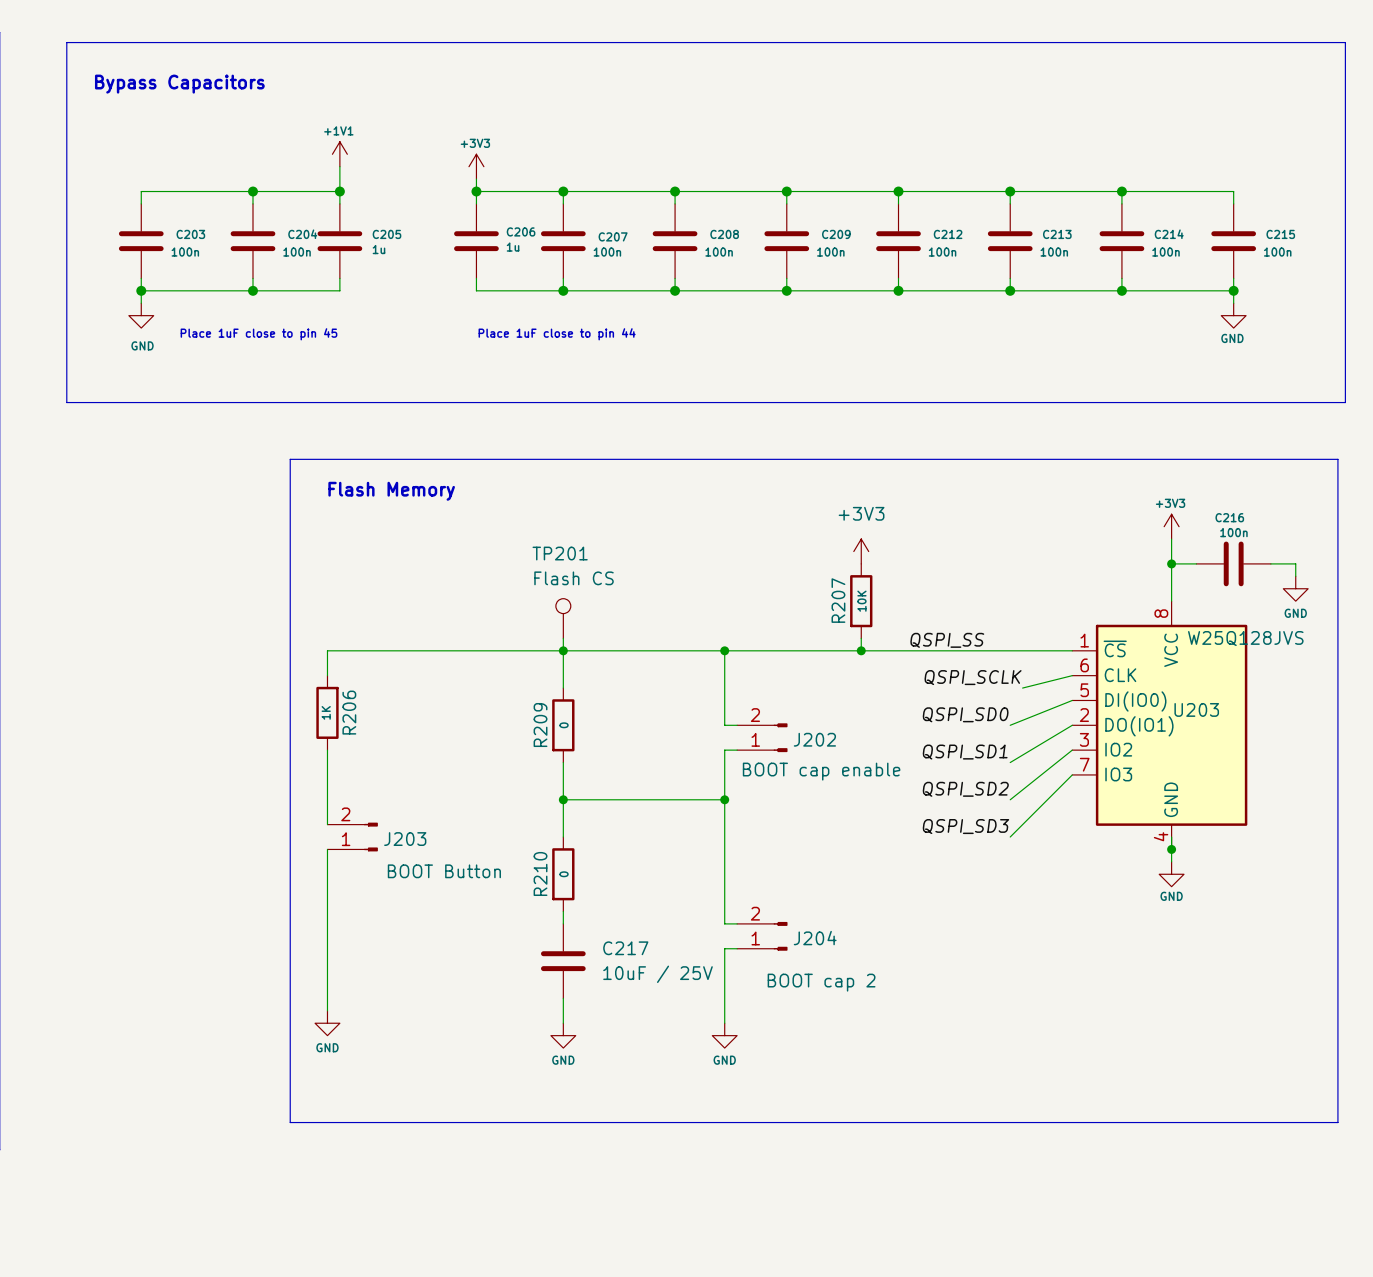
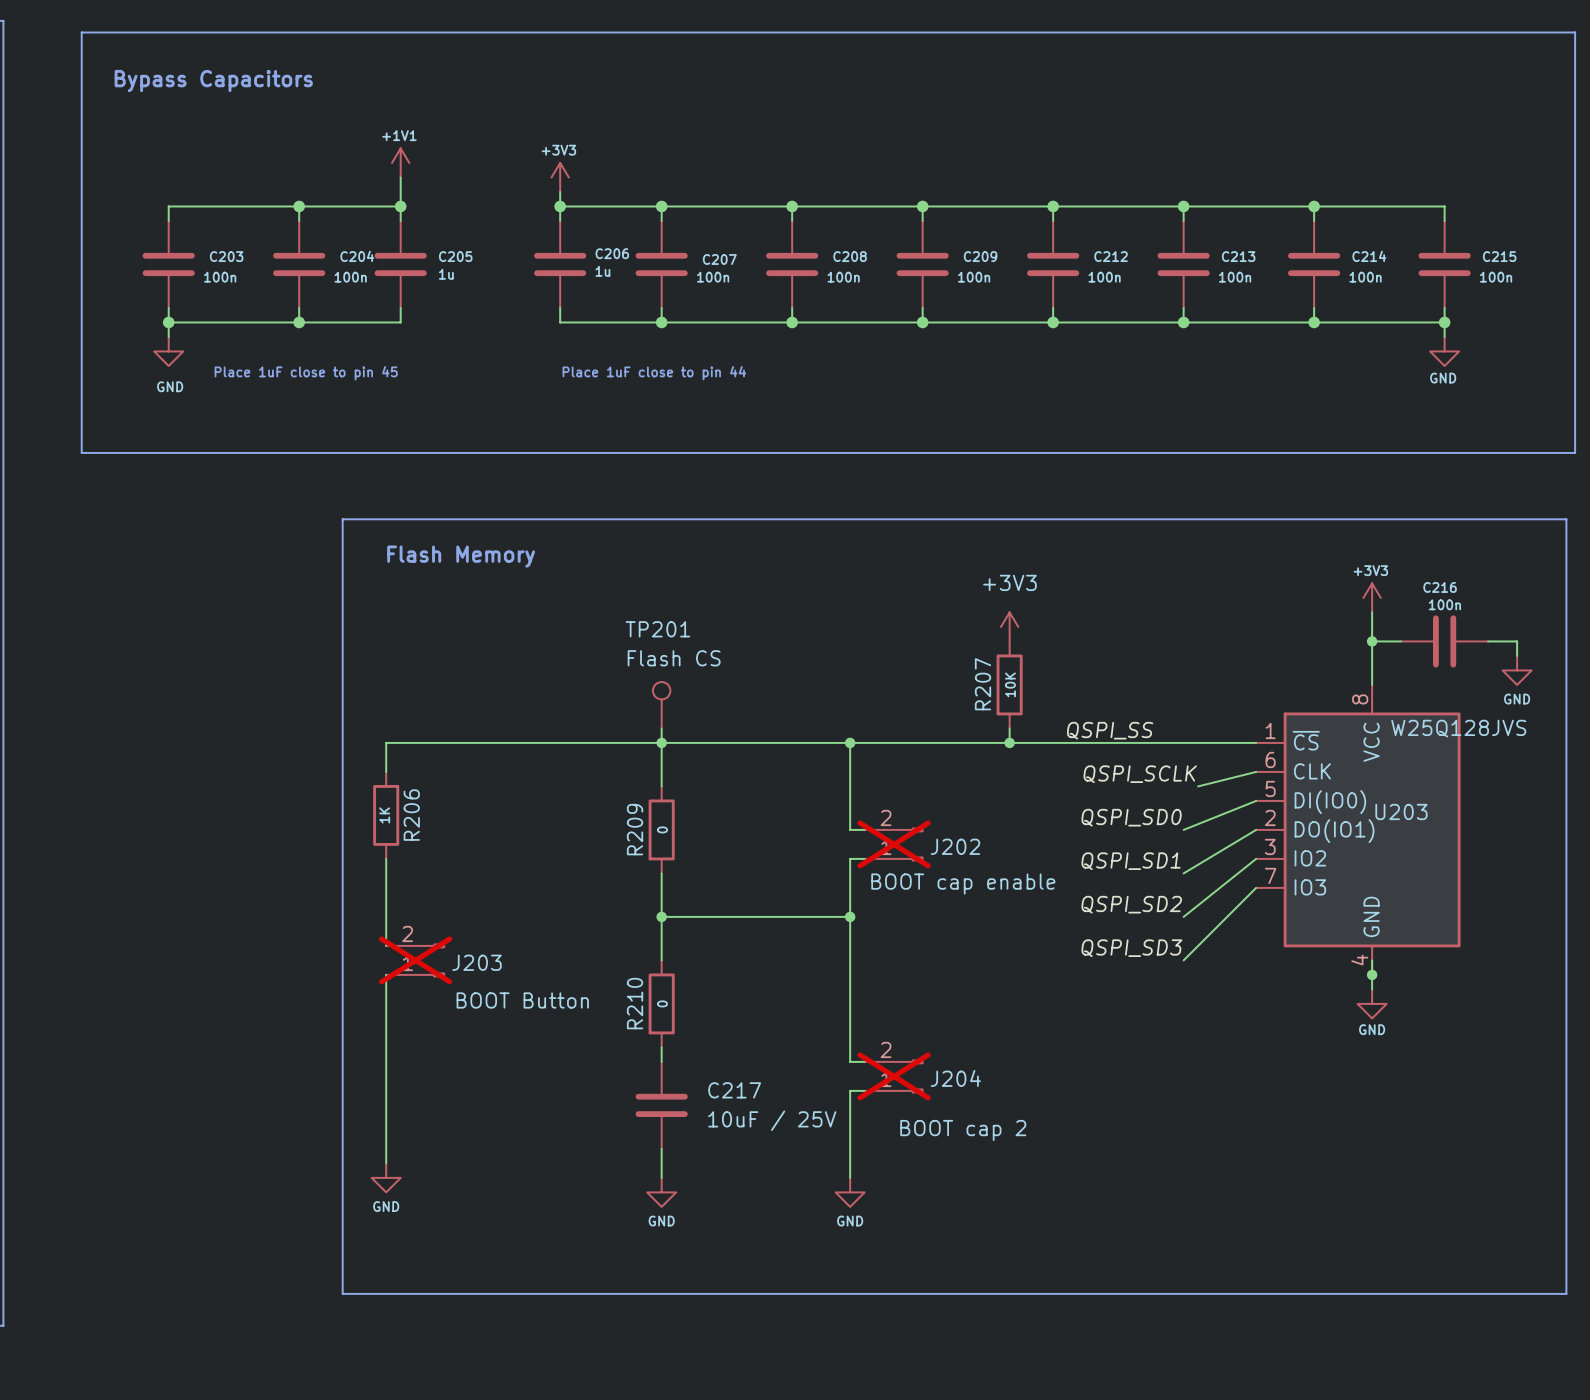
J202 do-not-place cross: none -> (894, 844)
J203 do-not-place cross: none -> (415, 960)
J204 do-not-place cross: none -> (894, 1076)

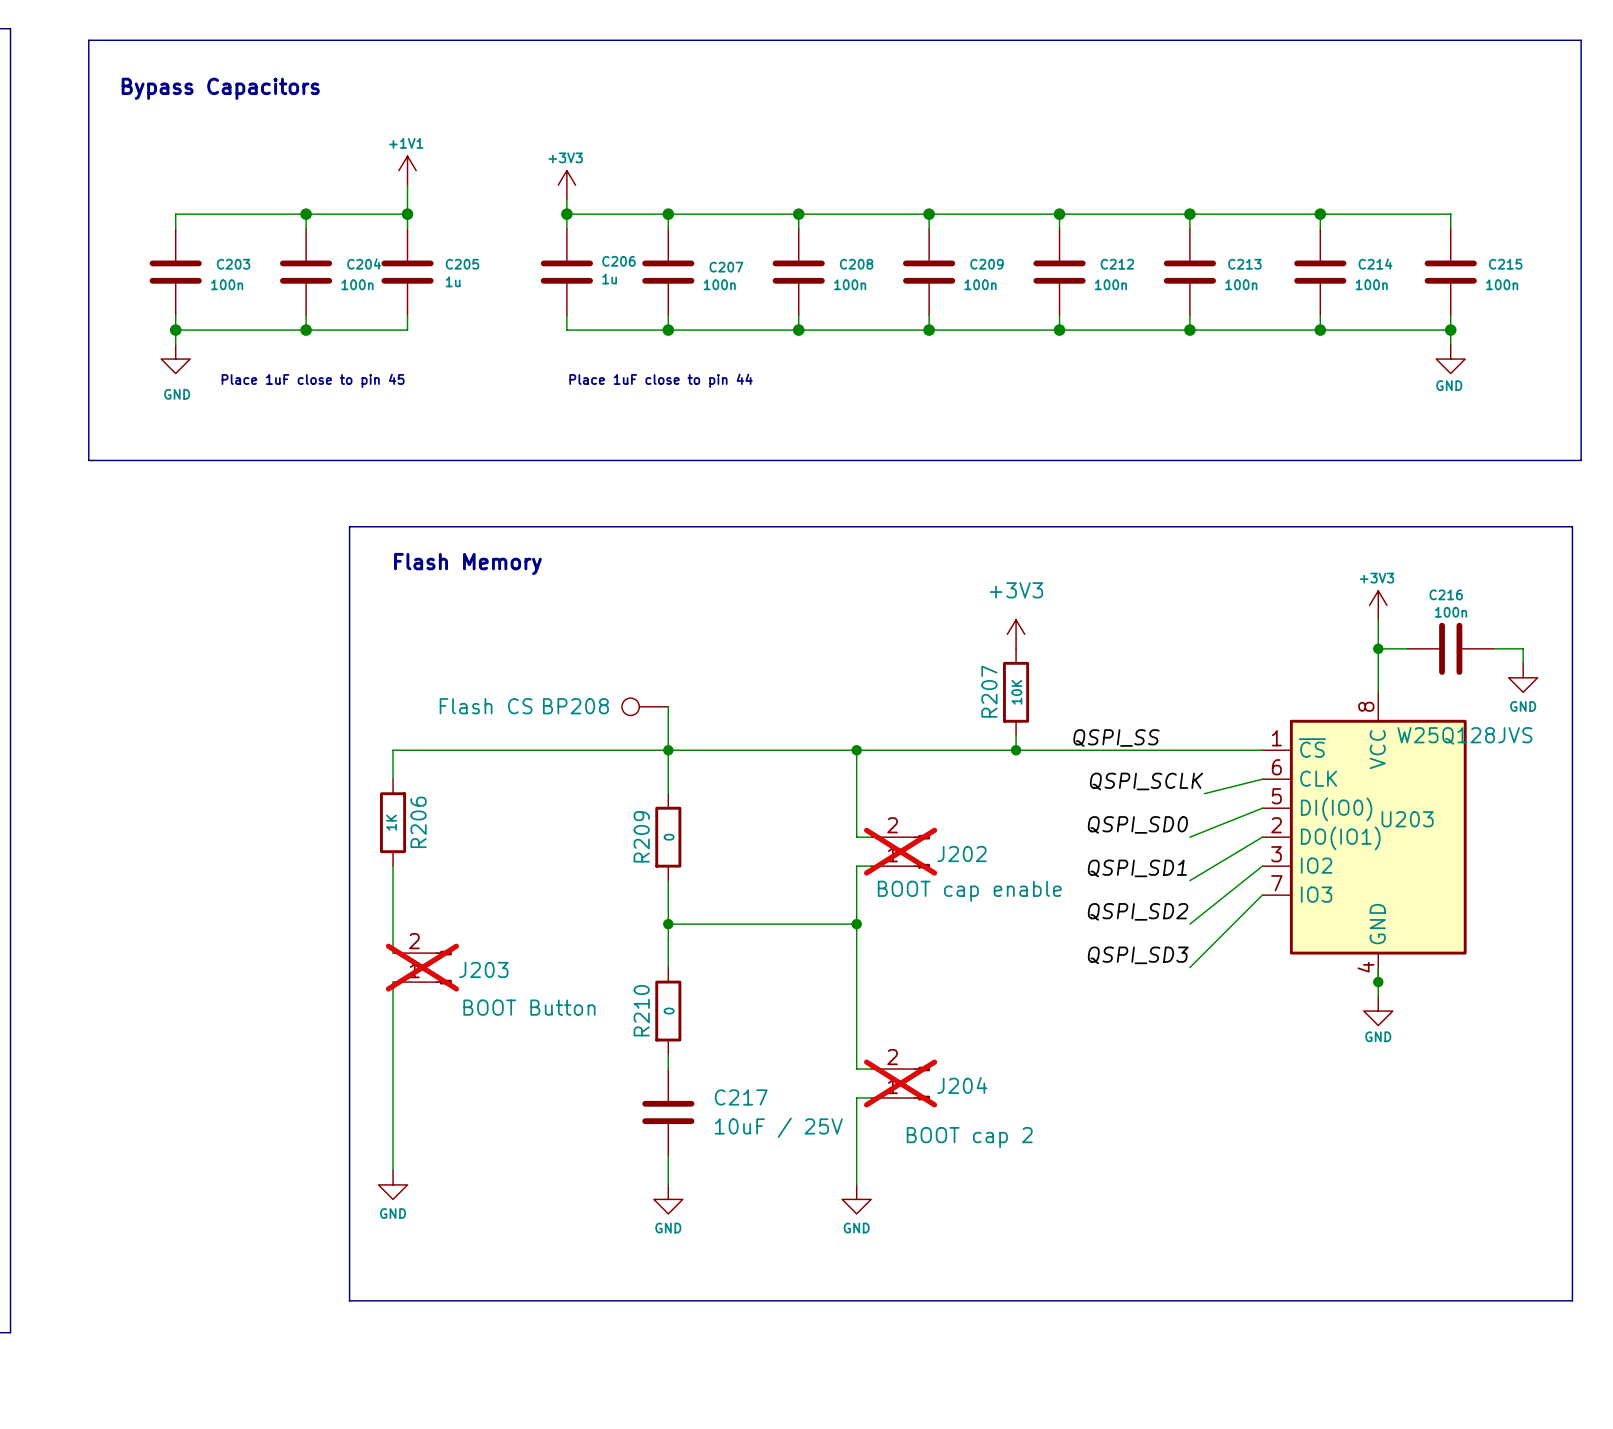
BP208: none -> Flash CS (645, 706)
TP201: Flash CS (661, 705) -> none

